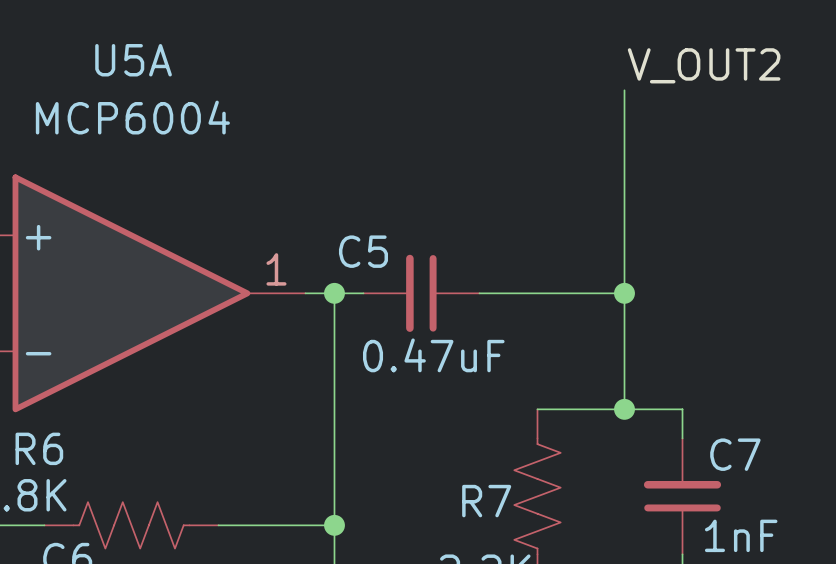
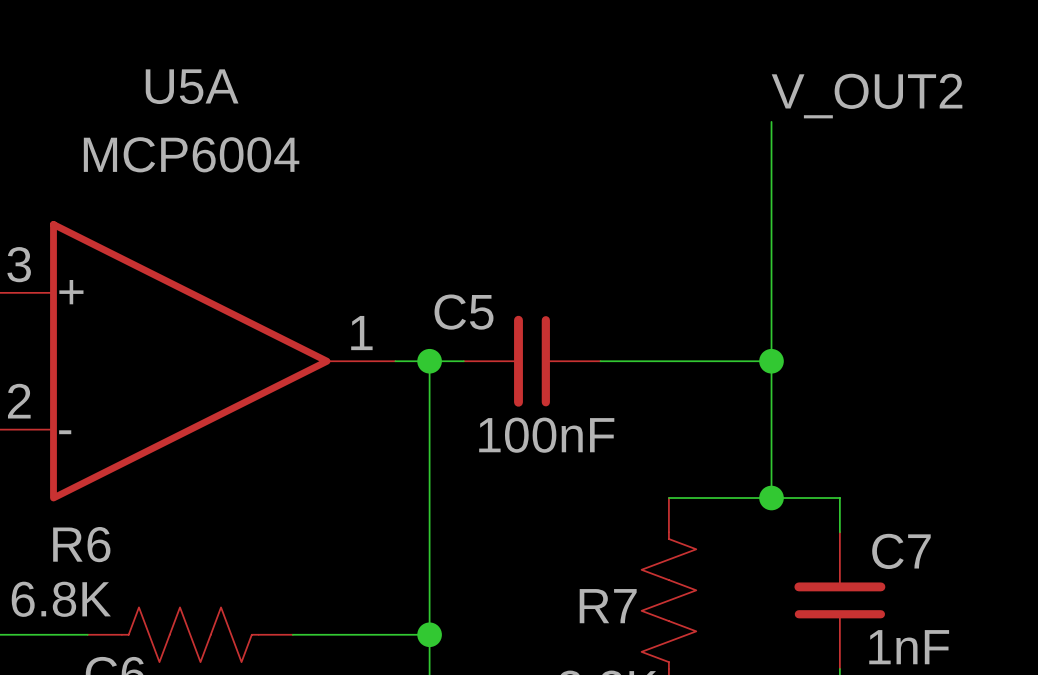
C5 value: 0.47uF (433, 355) -> 100nF (546, 435)

